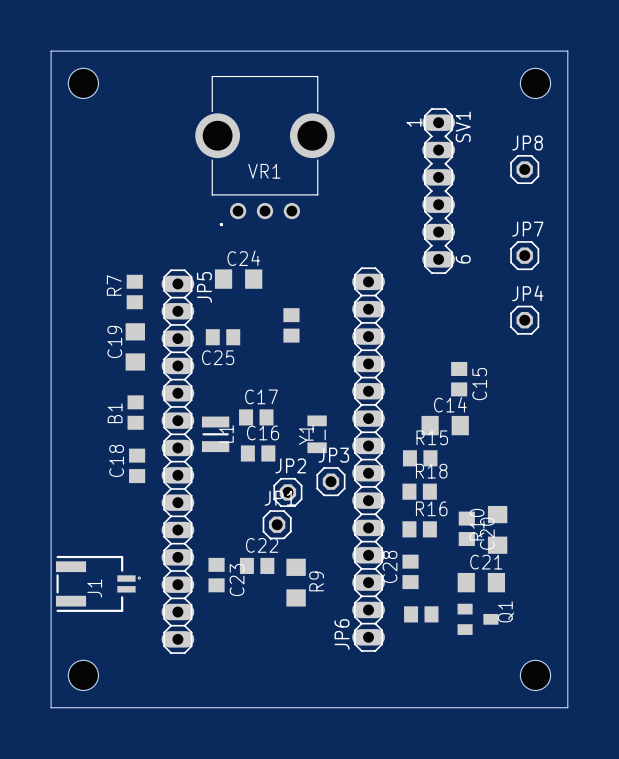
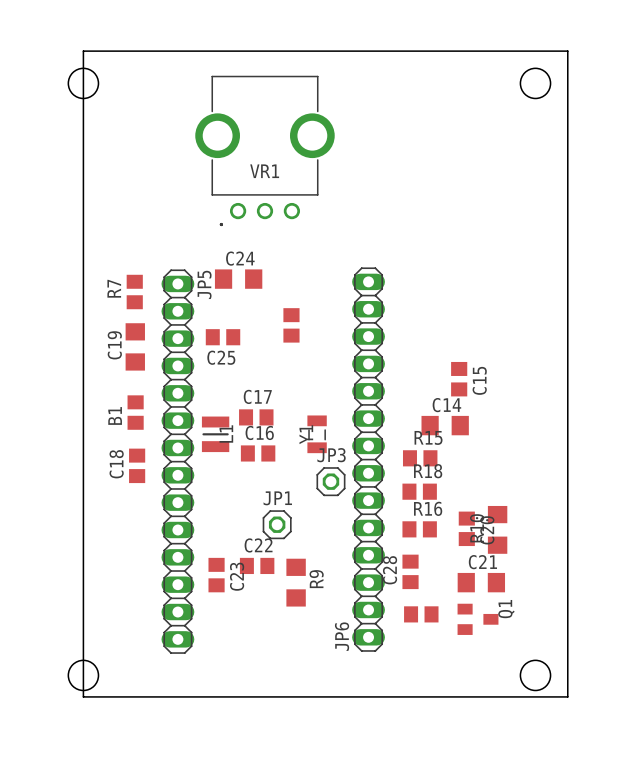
board edge: (83, 51) (51, 51) (51, 707) (567, 707) (567, 696) -> (83, 51) (83, 696) (567, 696)
JP8: (524, 169) -> none
SV1: (438, 191) -> none
JP7: (524, 255) -> none
JP4: (524, 320) -> none
JP2: (287, 492) -> none
J1: (98, 583) -> none

